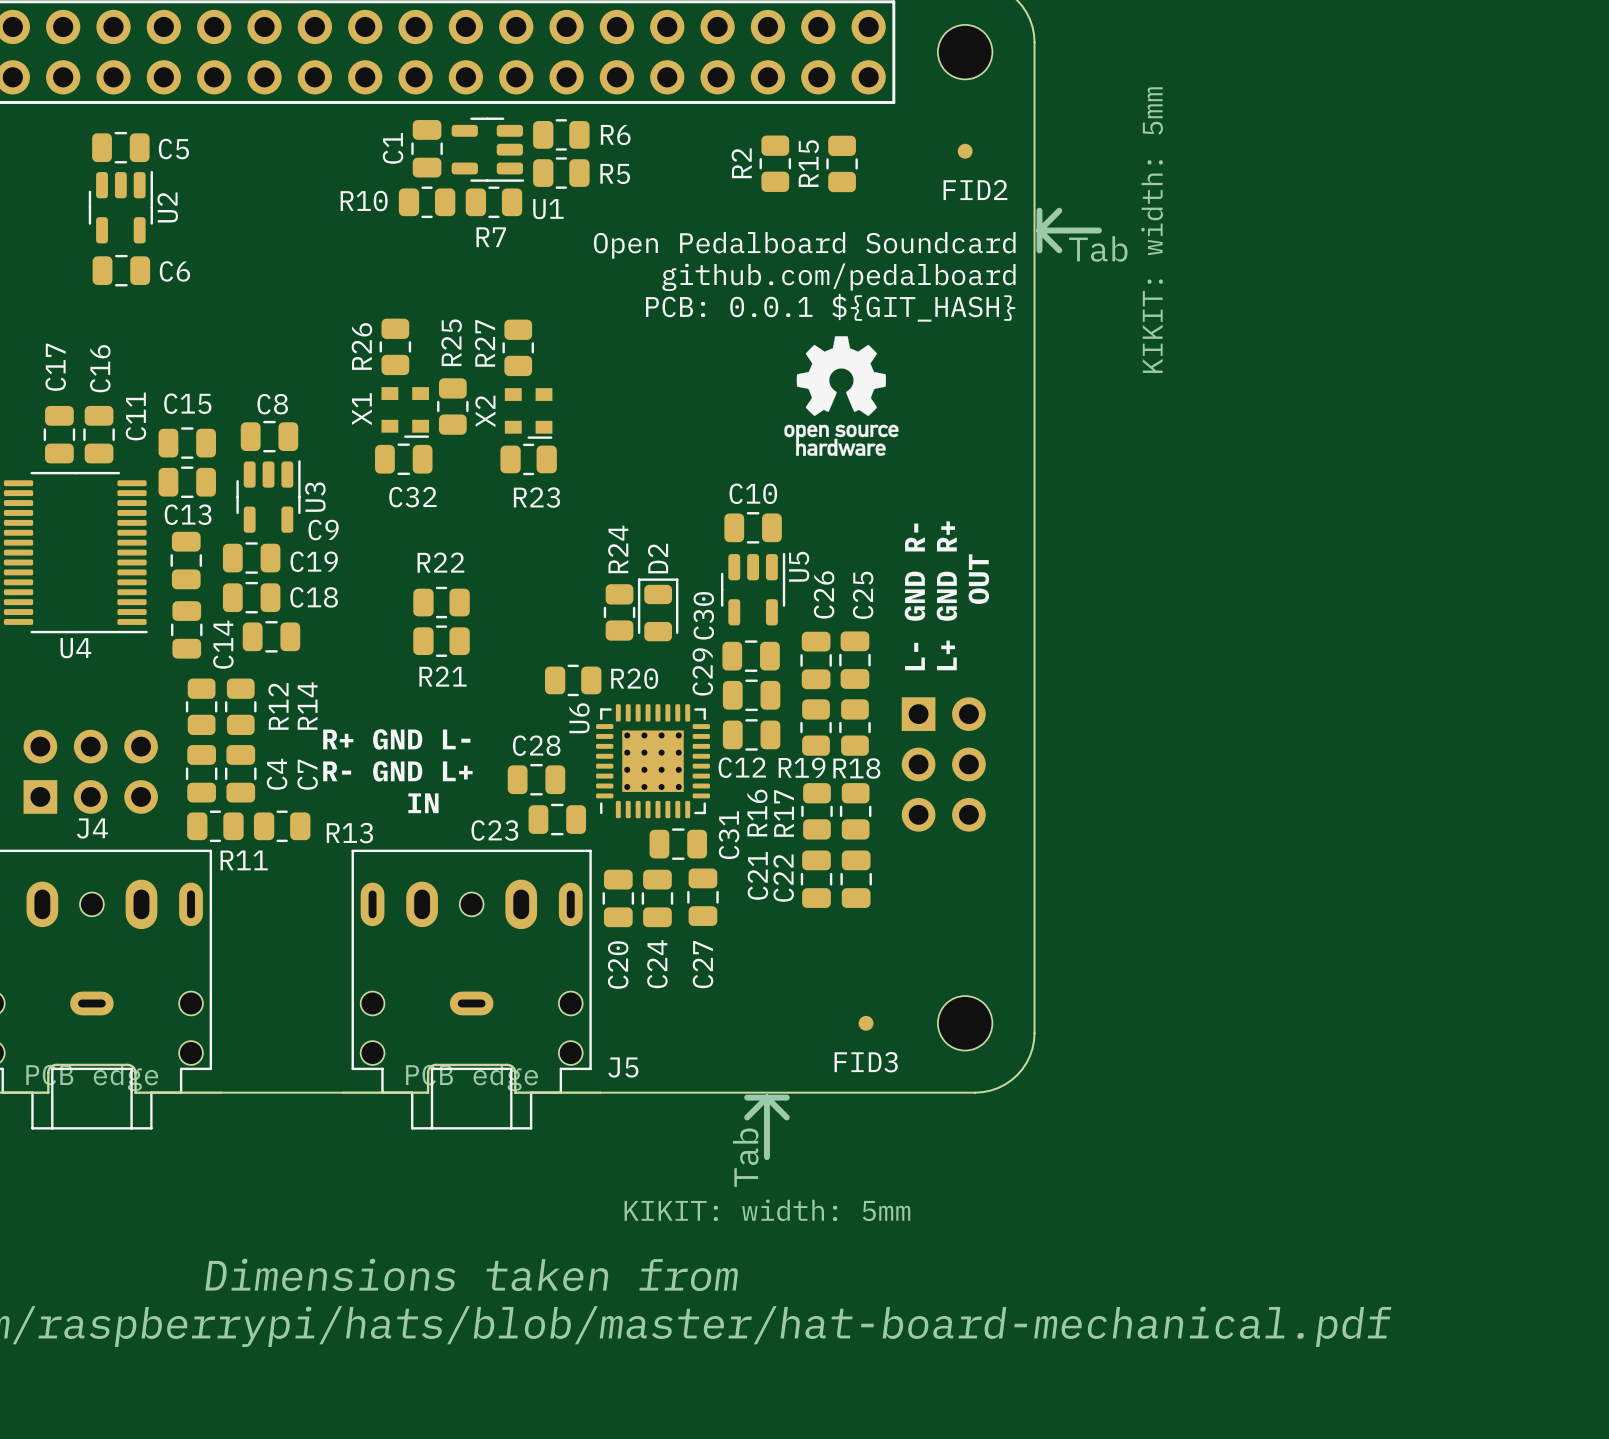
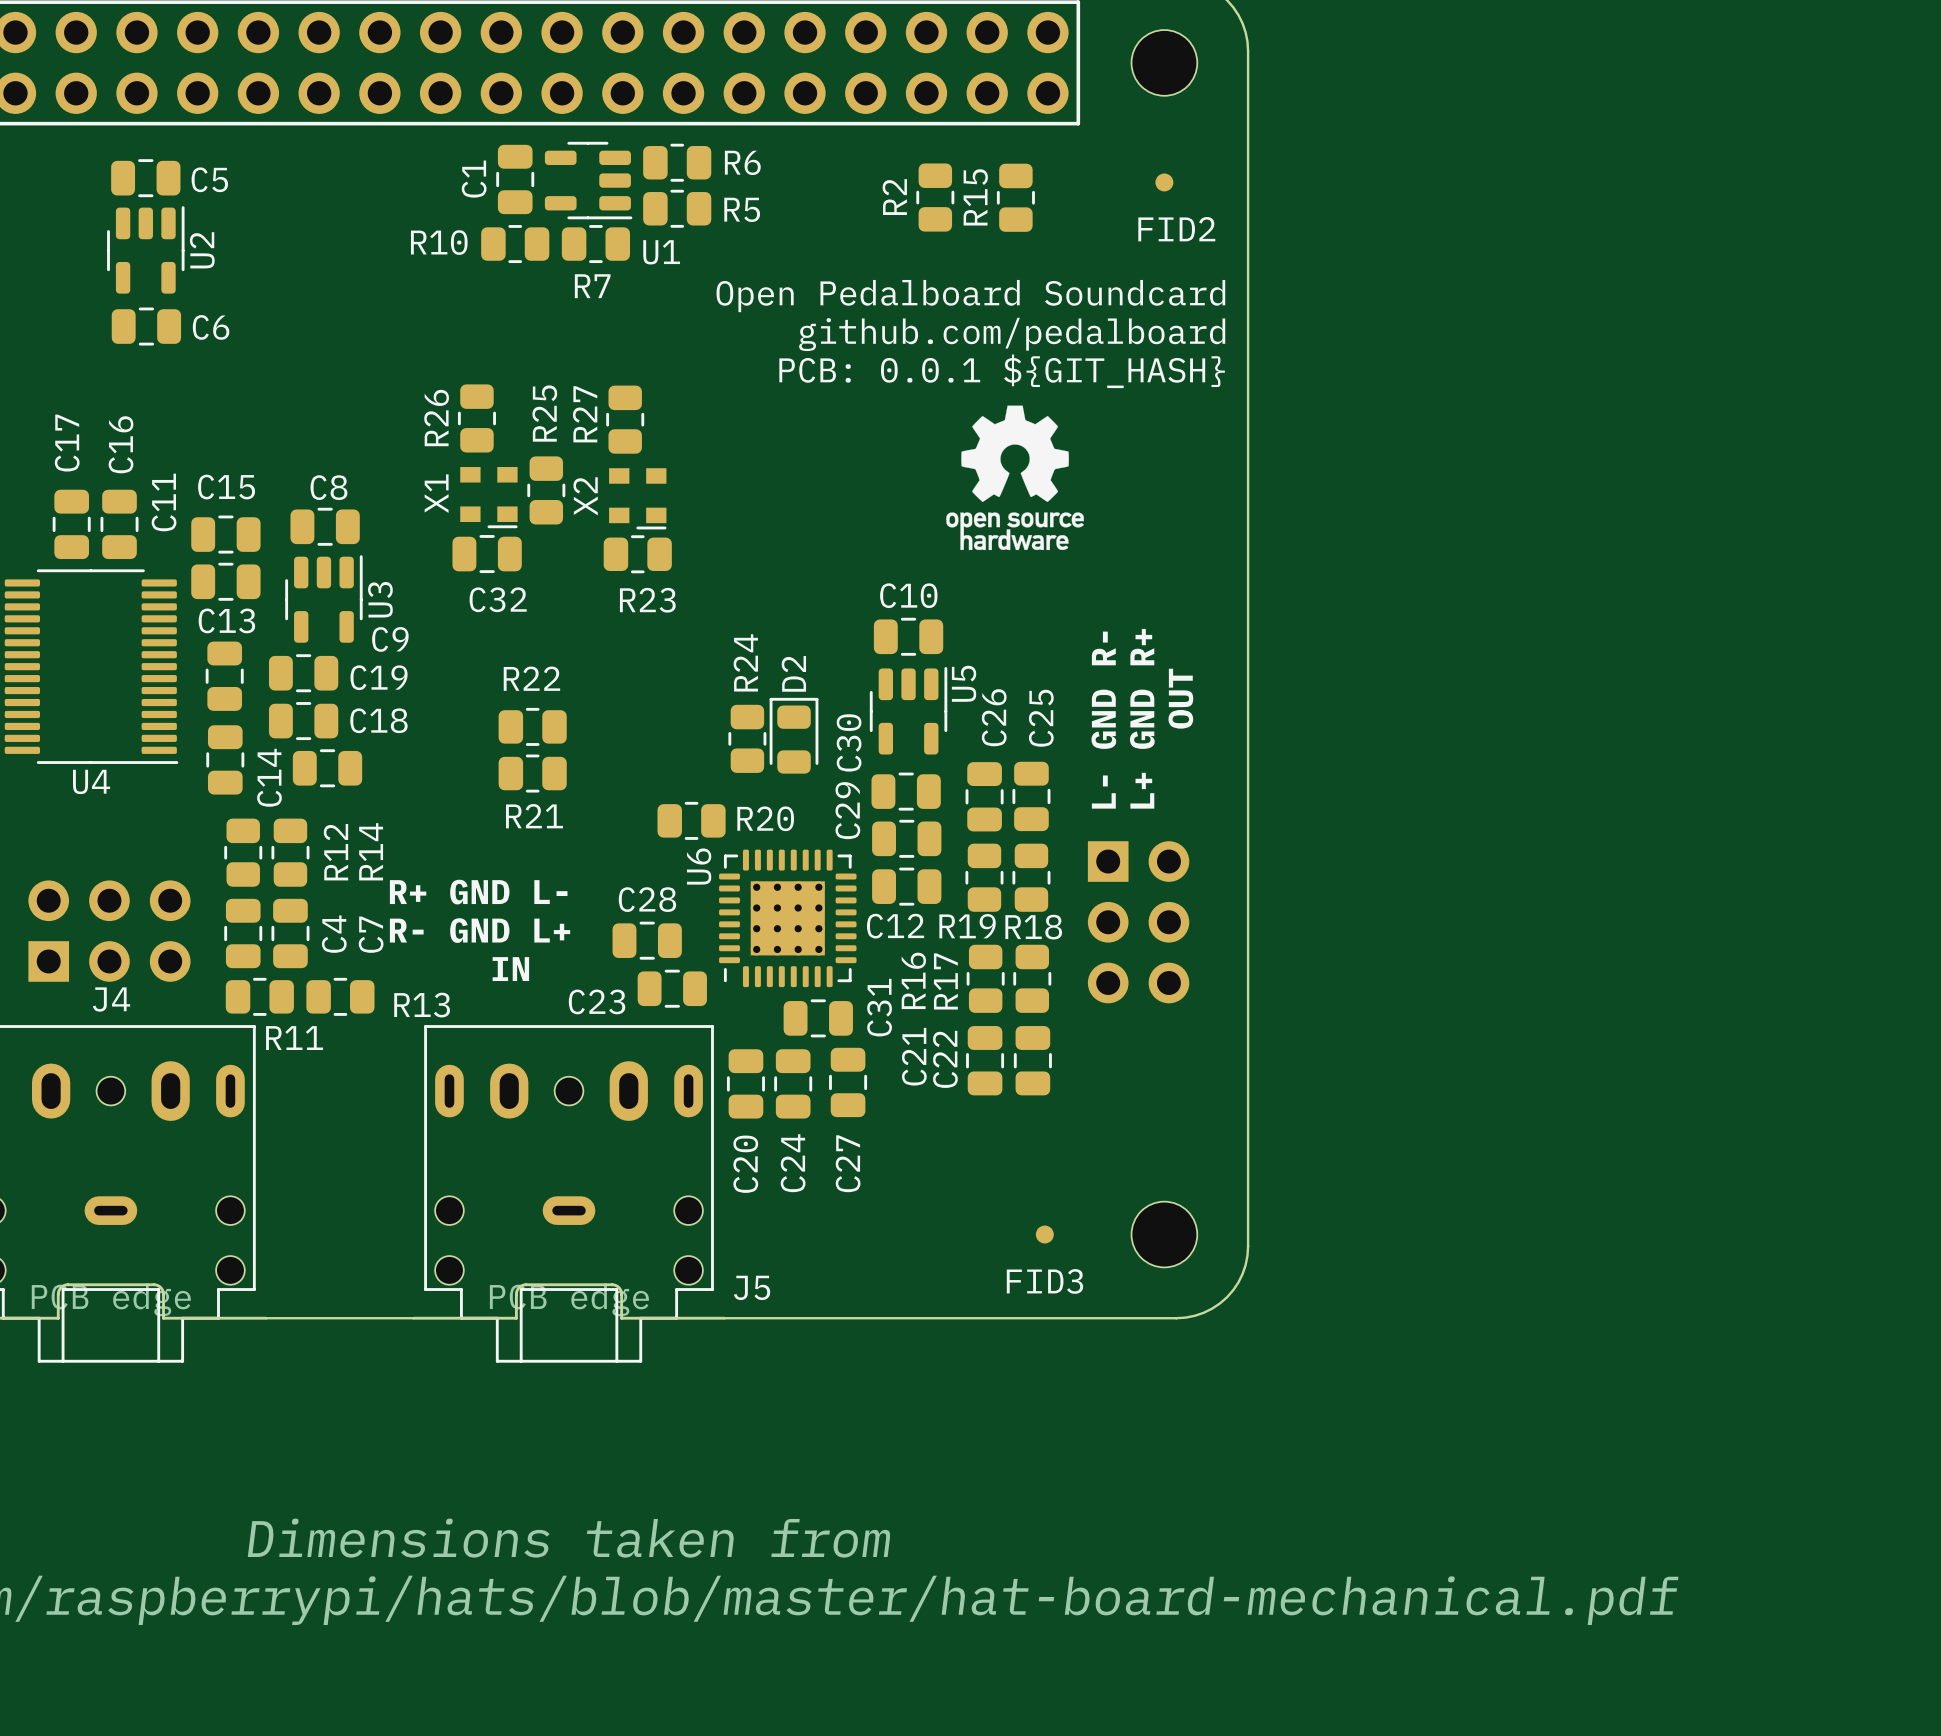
drawing: [1036, 207, 1102, 254] -> none
drawing: [744, 1094, 790, 1161] -> none

